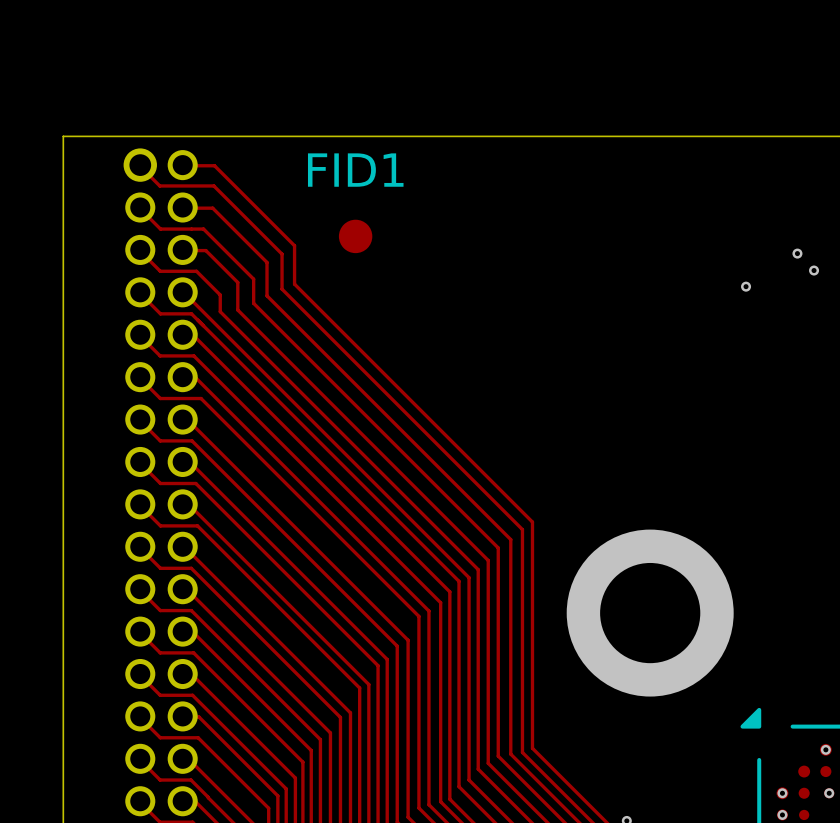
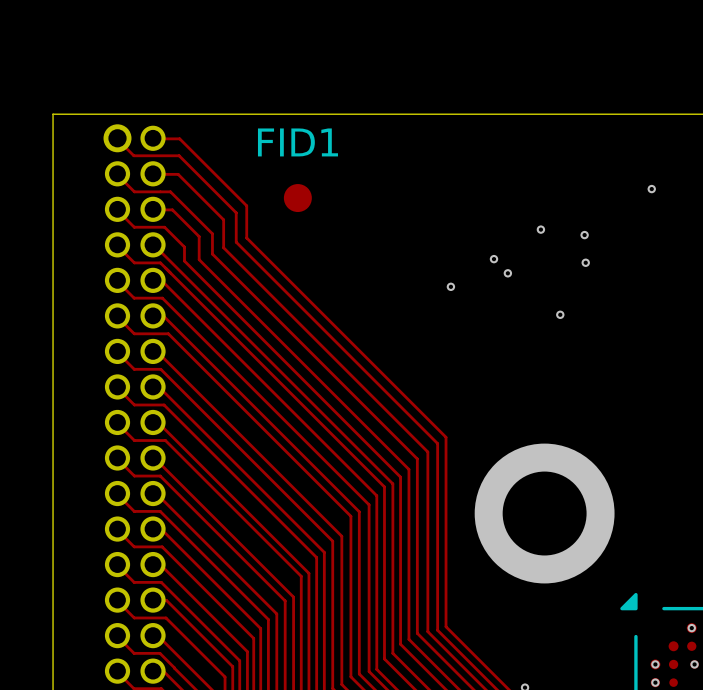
via: none -> (651, 189)
via: (797, 253) -> none
via: (814, 270) -> none
via: none -> (540, 229)
via: none -> (584, 235)
via: (746, 286) -> none
via: none -> (493, 259)
via: none -> (585, 262)
via: none -> (507, 273)
via: none -> (450, 286)
via: none -> (560, 314)

